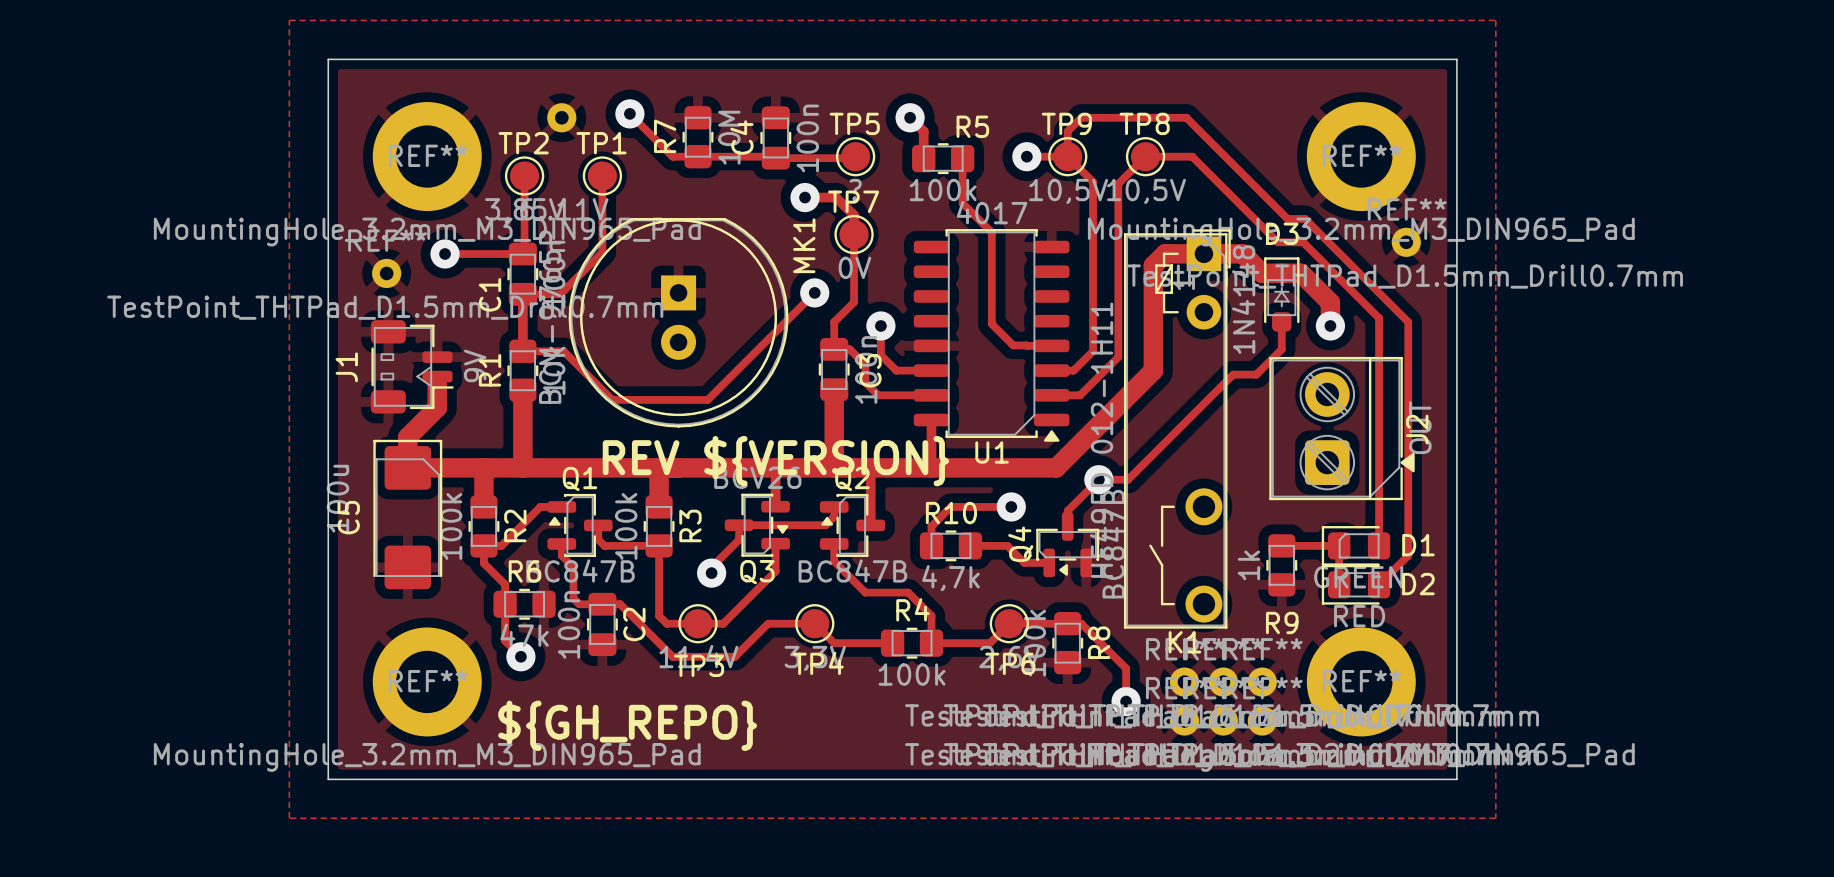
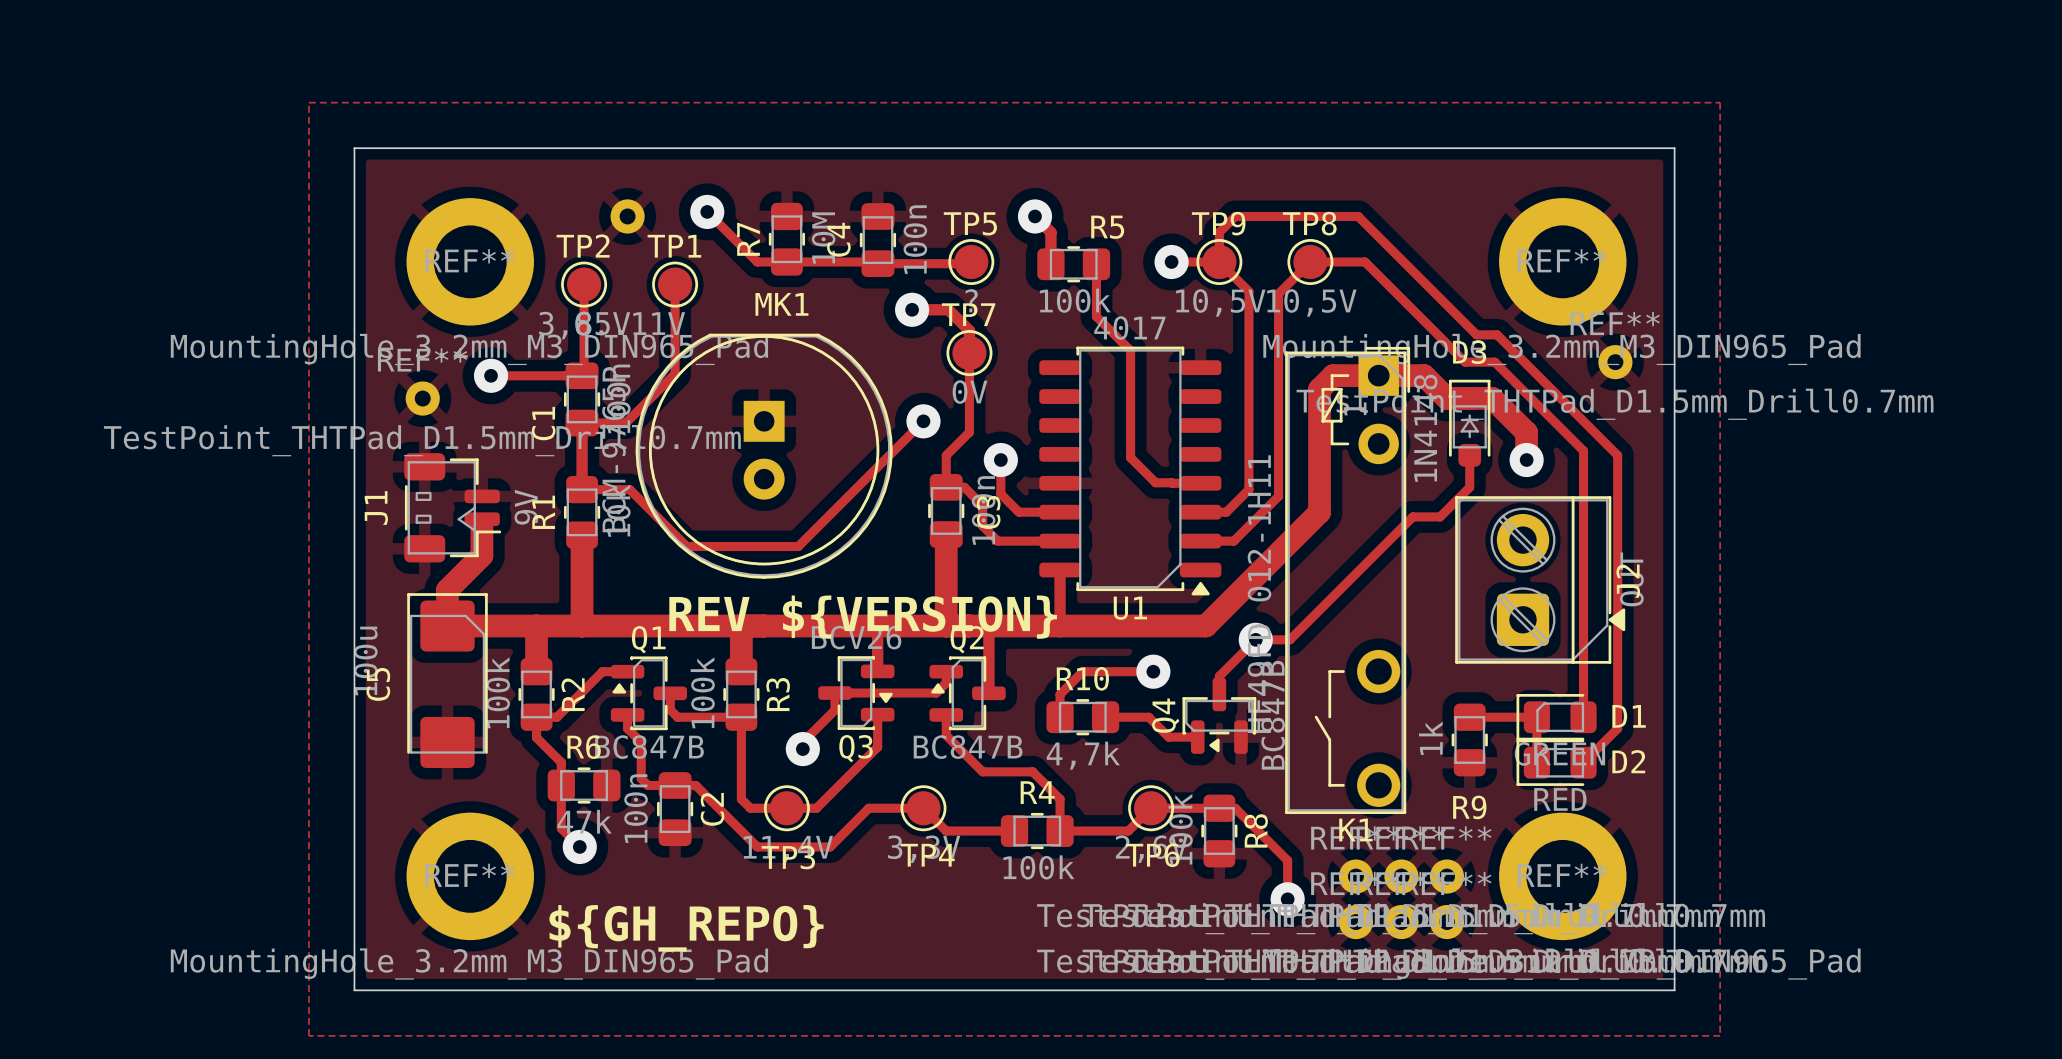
MK1 name rotation: 0° (804, 245) -> 90° clockwise (781, 304)
MK1 name position: MK1 (804, 245) -> MK1 (781, 304)

